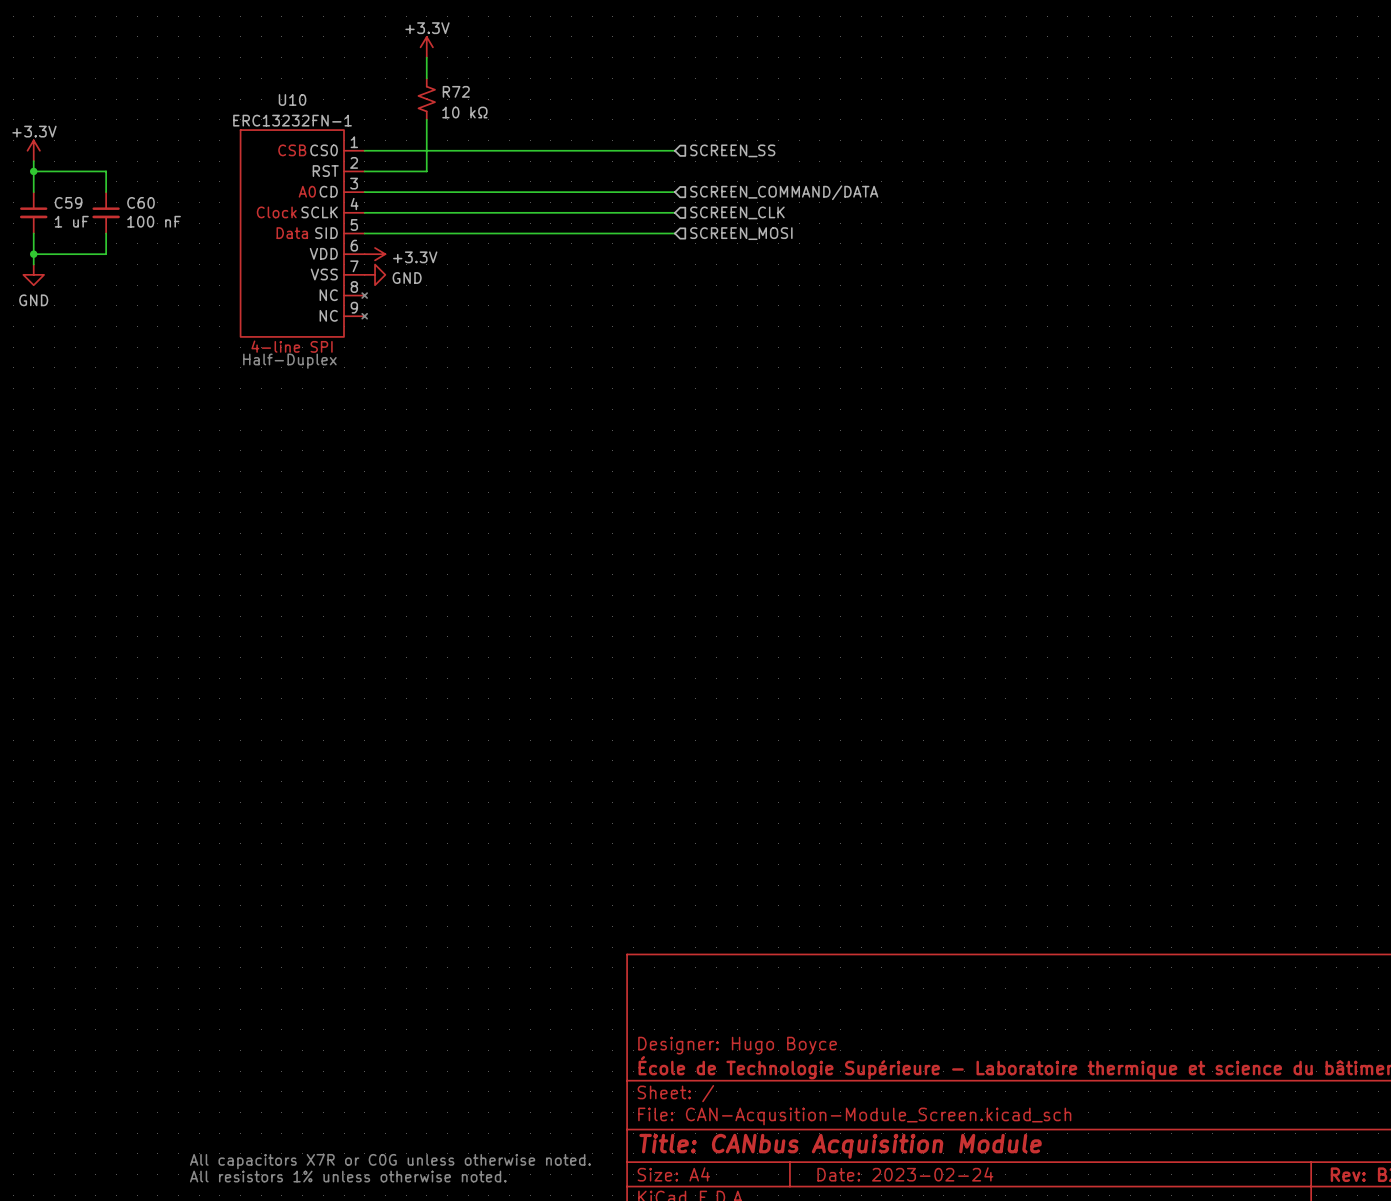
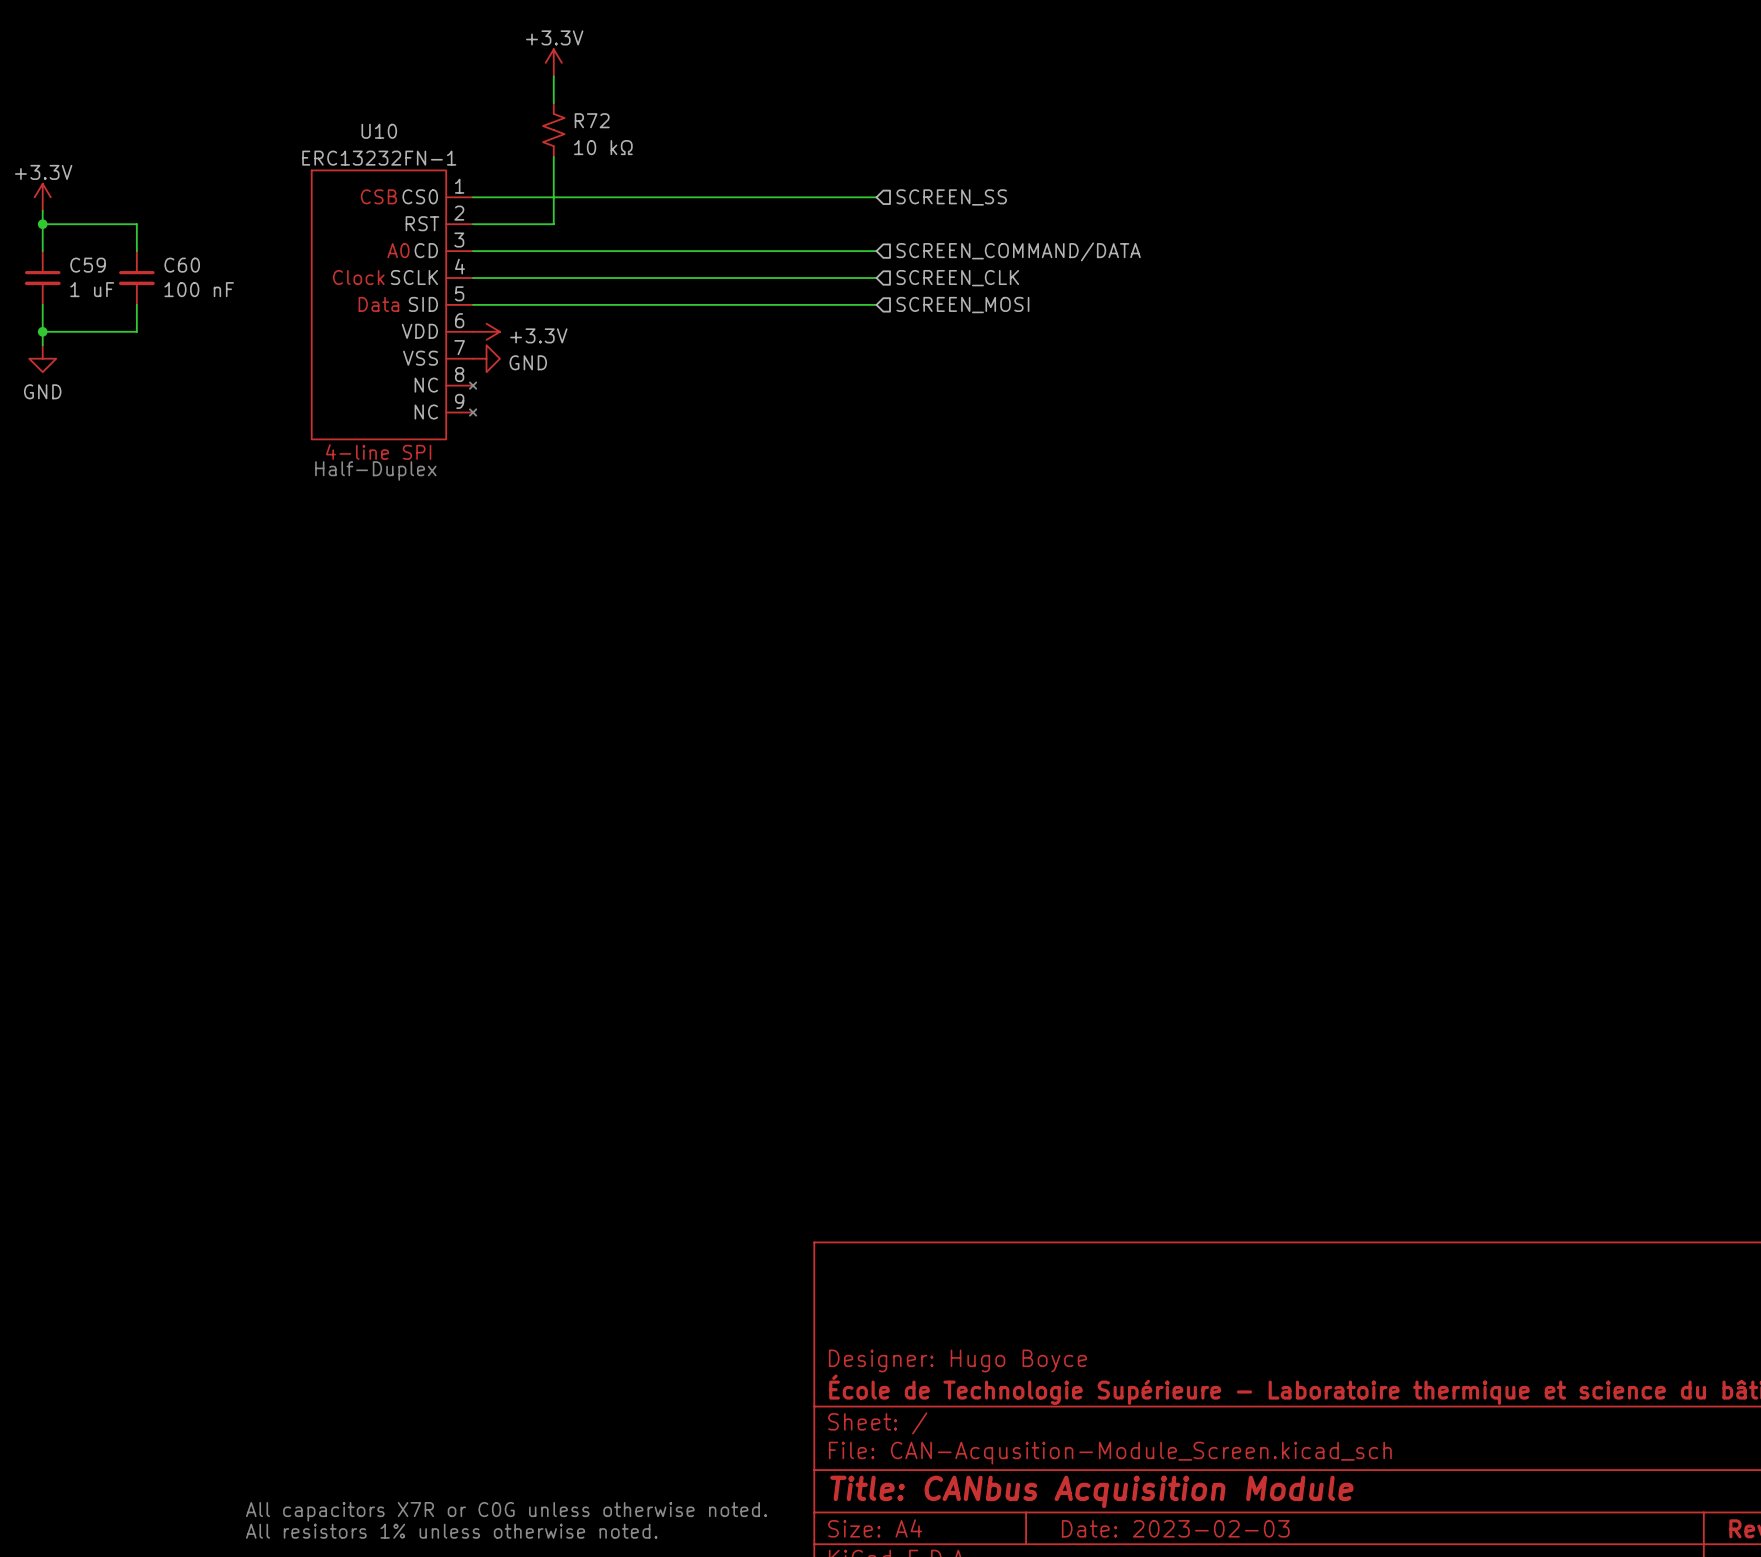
title block: Date: 2023-02-24 (905, 1174) -> Date: 2023-02-03 (1175, 1528)

